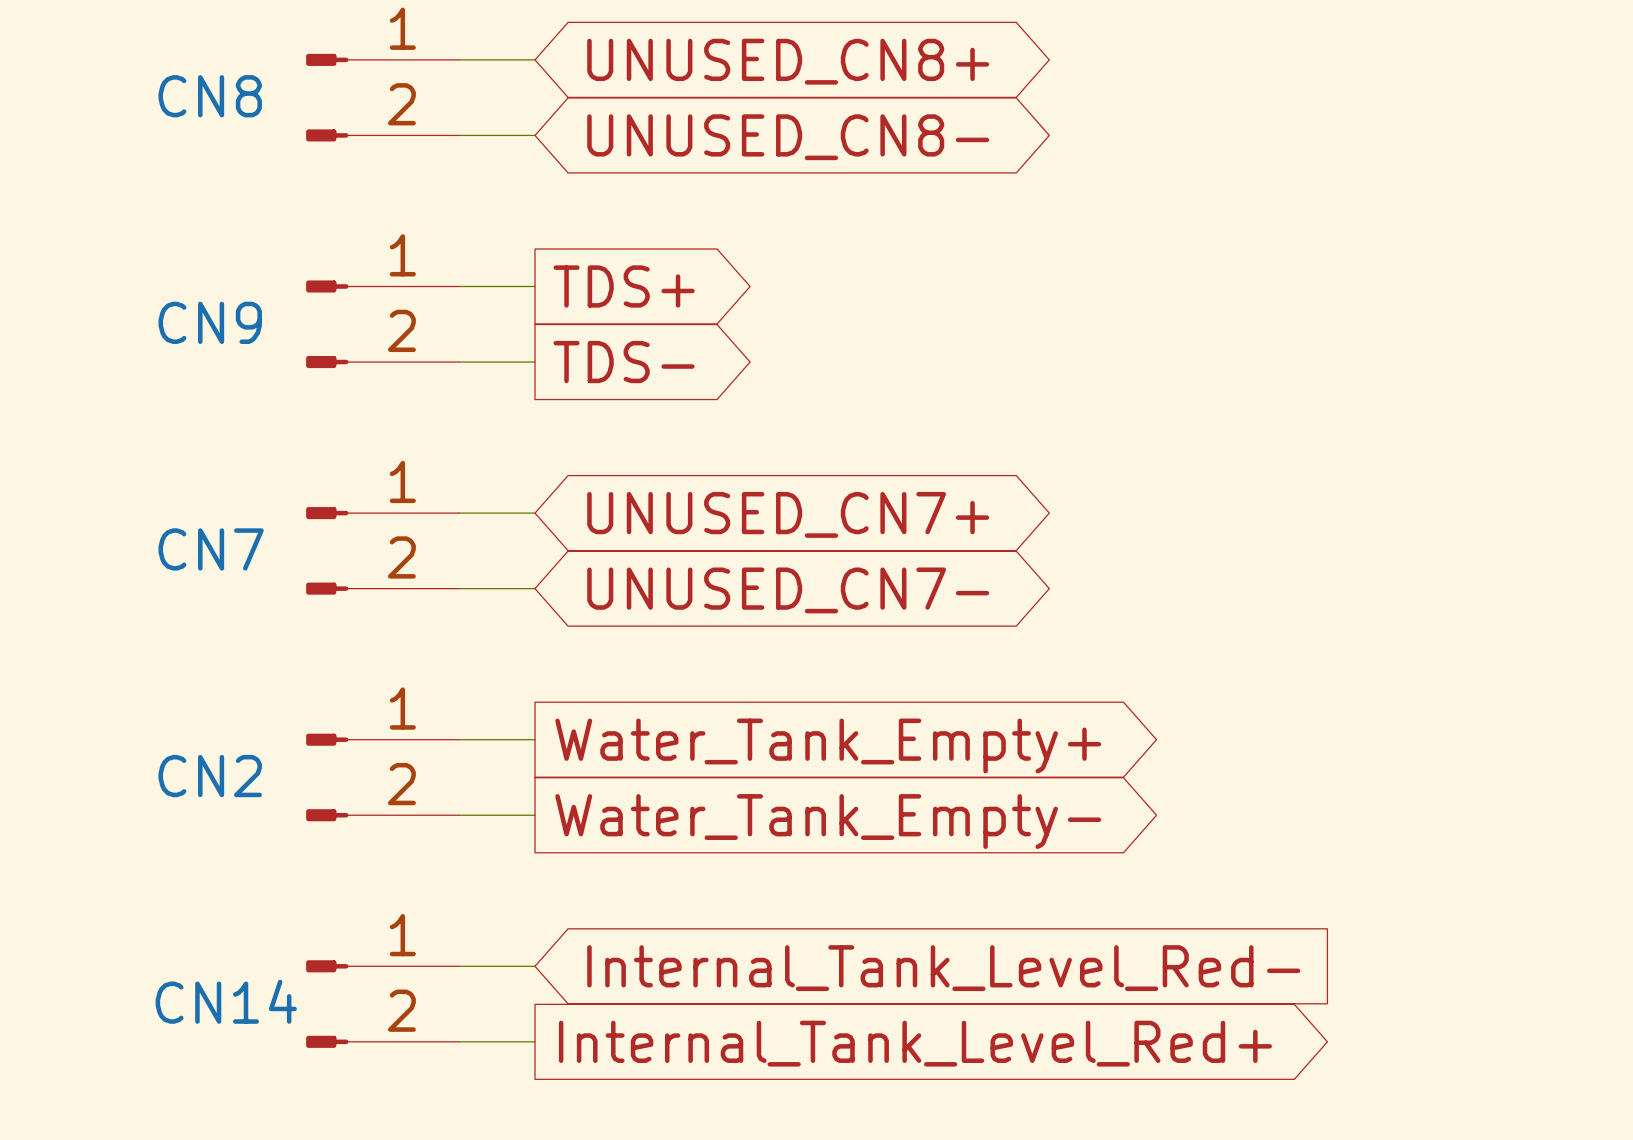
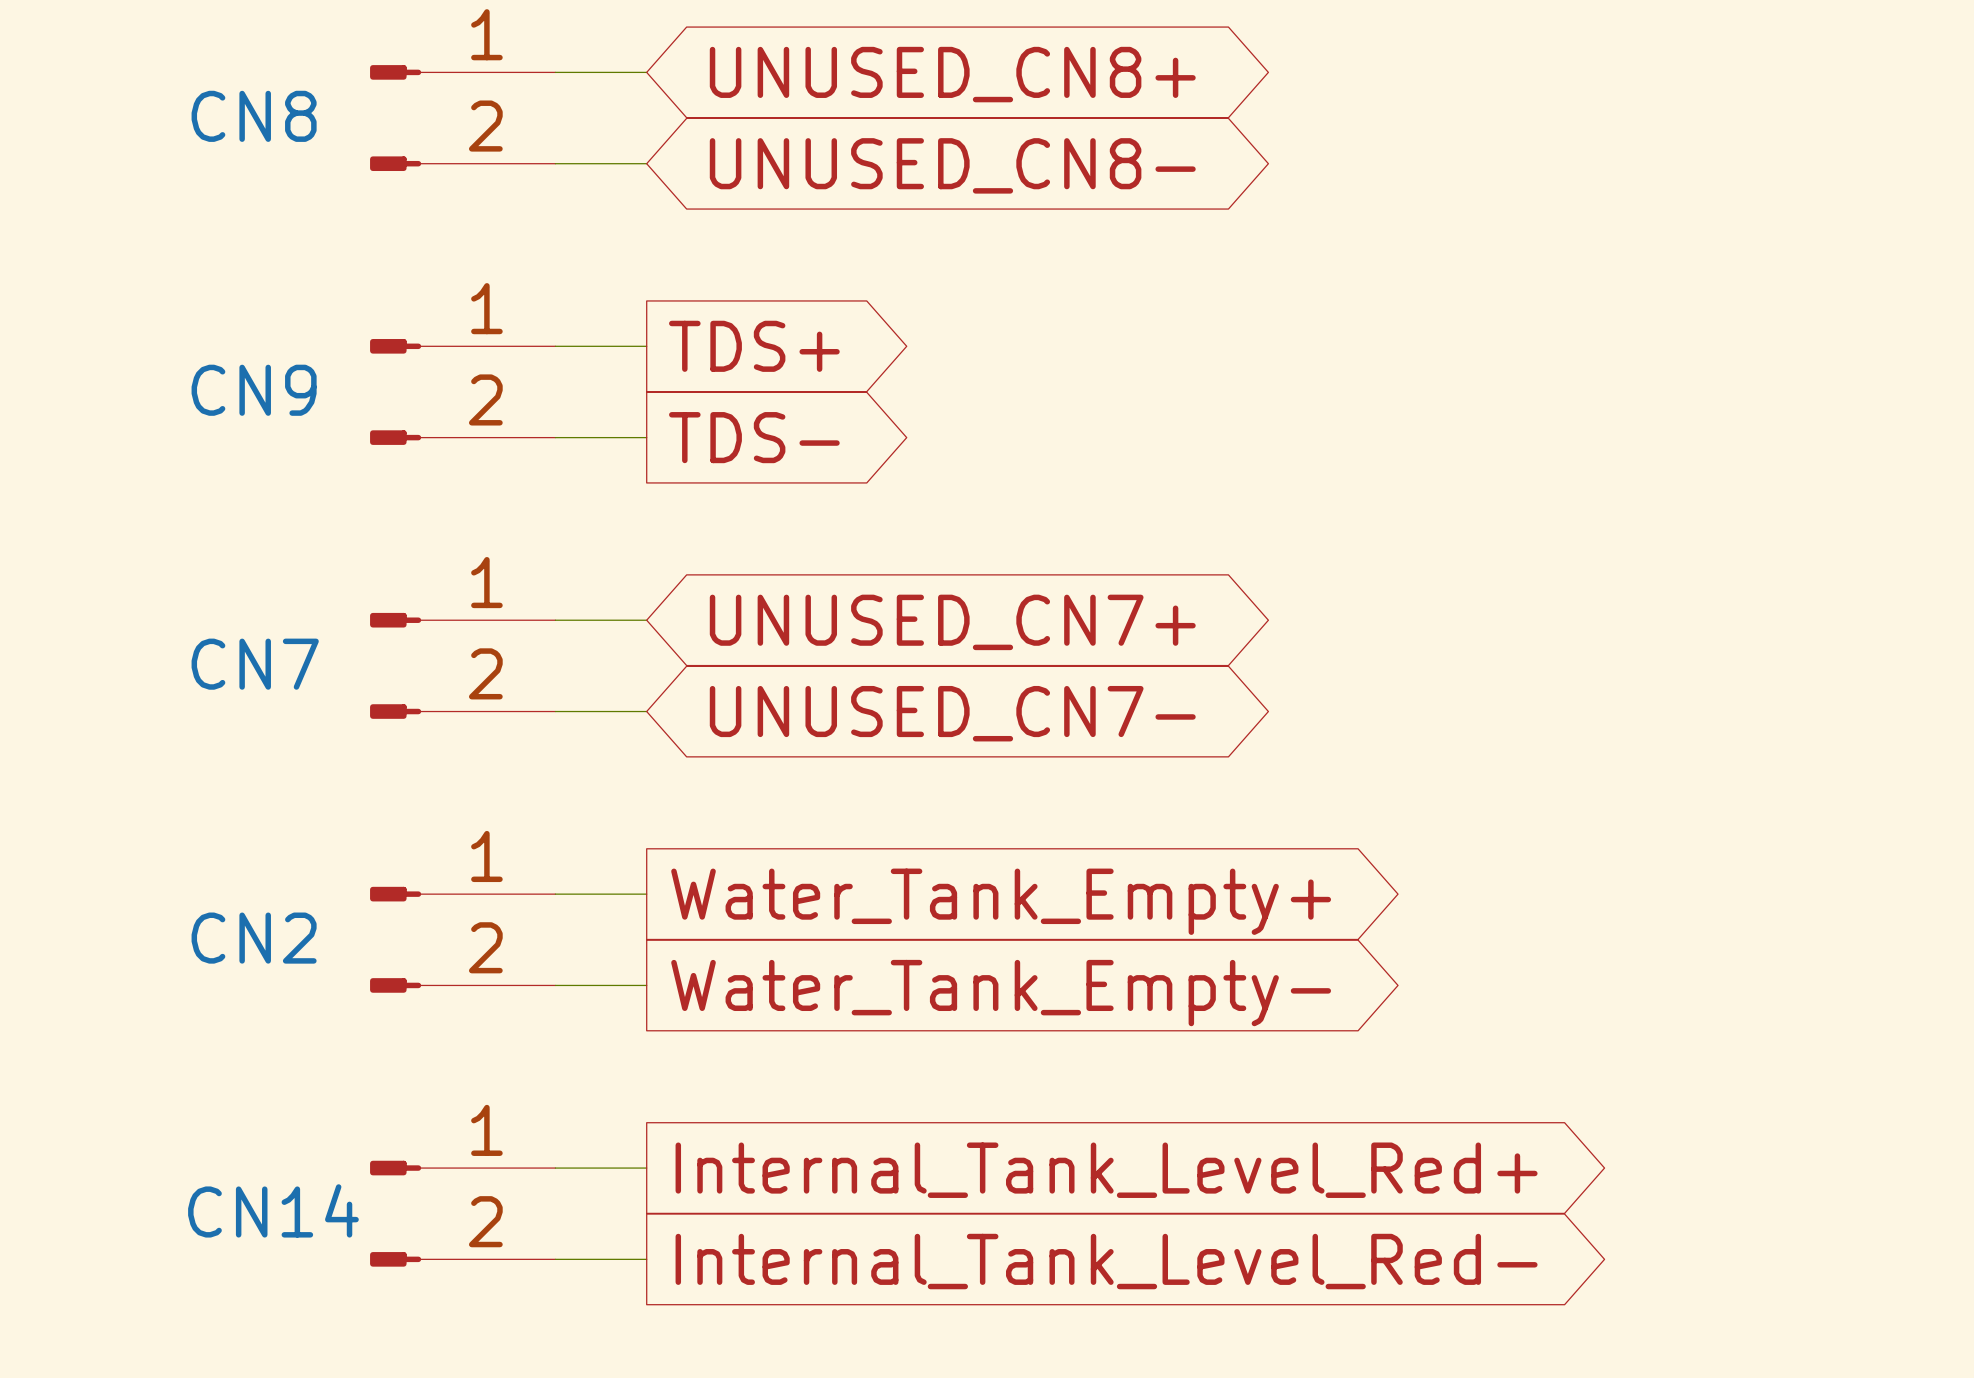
global label shape: input (943, 968) -> output (1106, 1170)
global label: Internal_Tank_Level_Red- (943, 968) -> Internal_Tank_Level_Red+ (1106, 1170)
global label: Internal_Tank_Level_Red+ (915, 1043) -> Internal_Tank_Level_Red- (1106, 1261)

